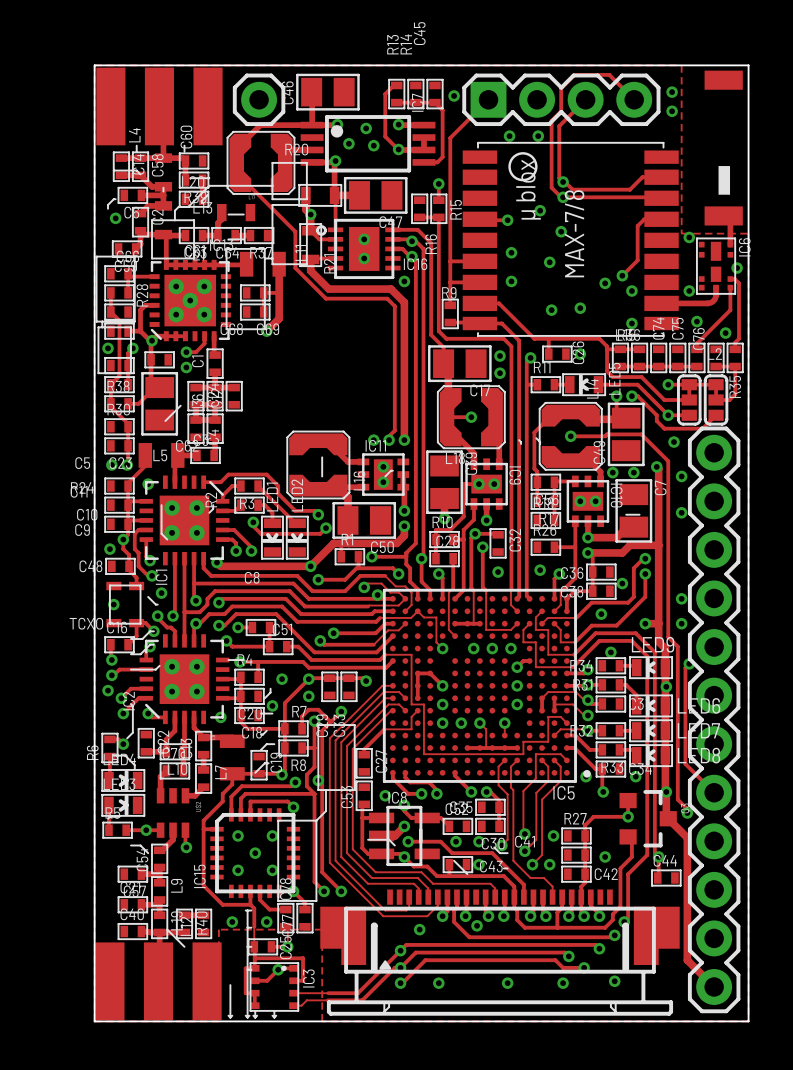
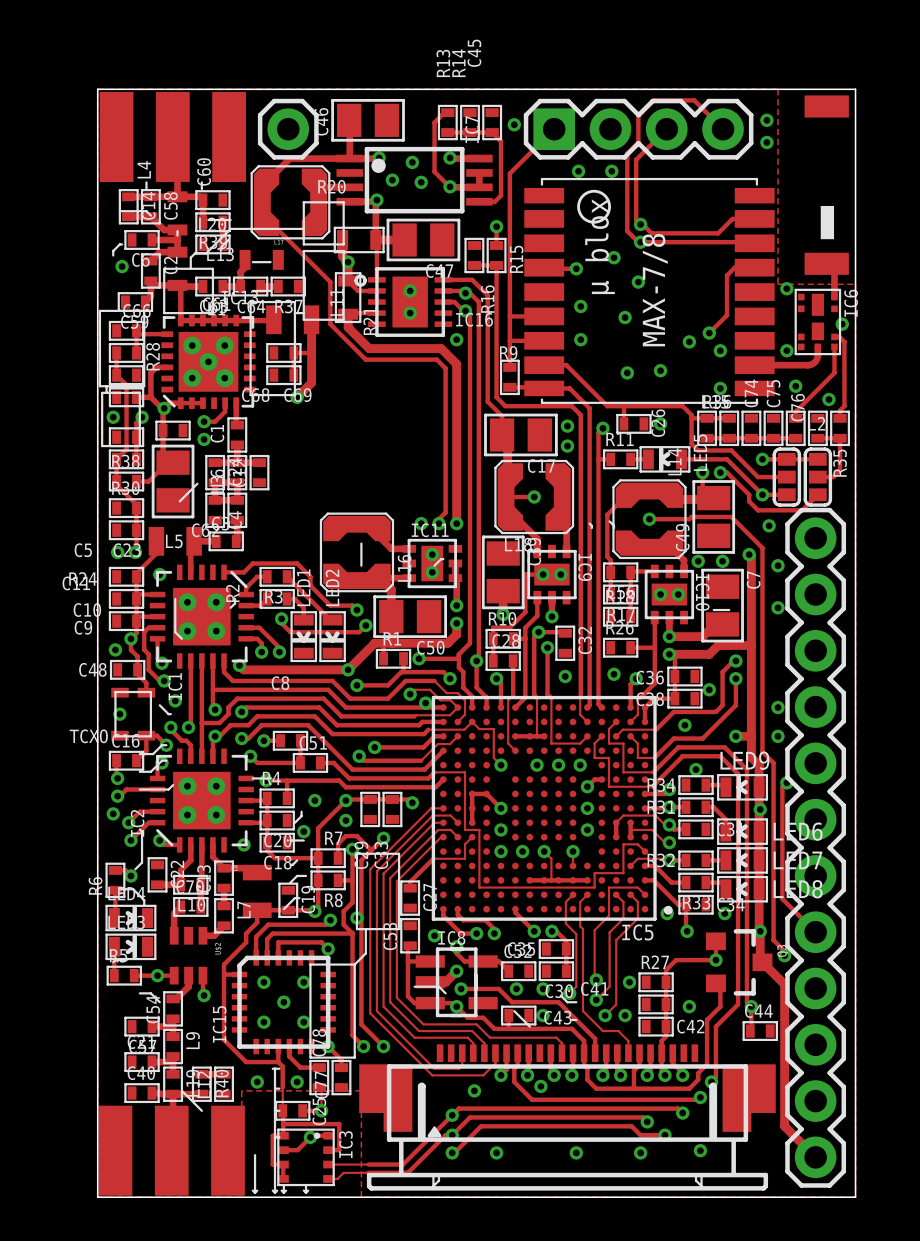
drawing: [687, 388, 718, 397] -> none

